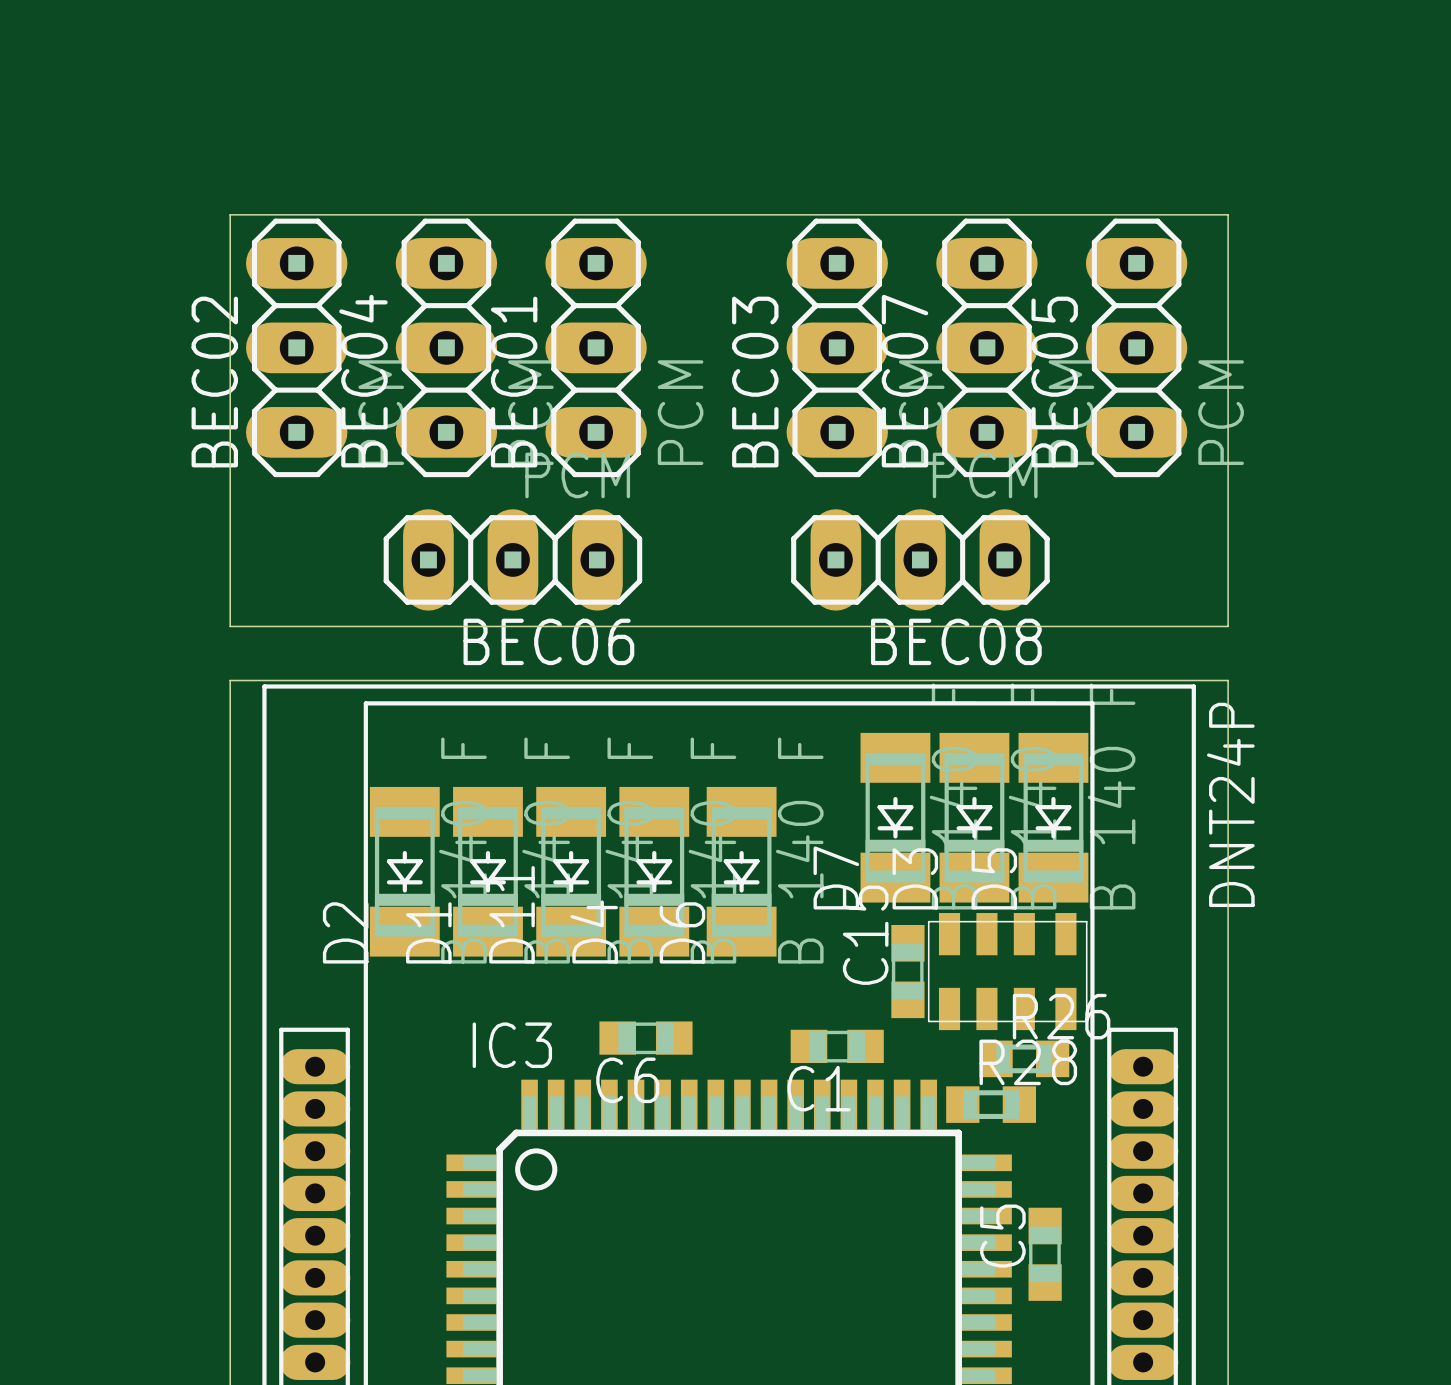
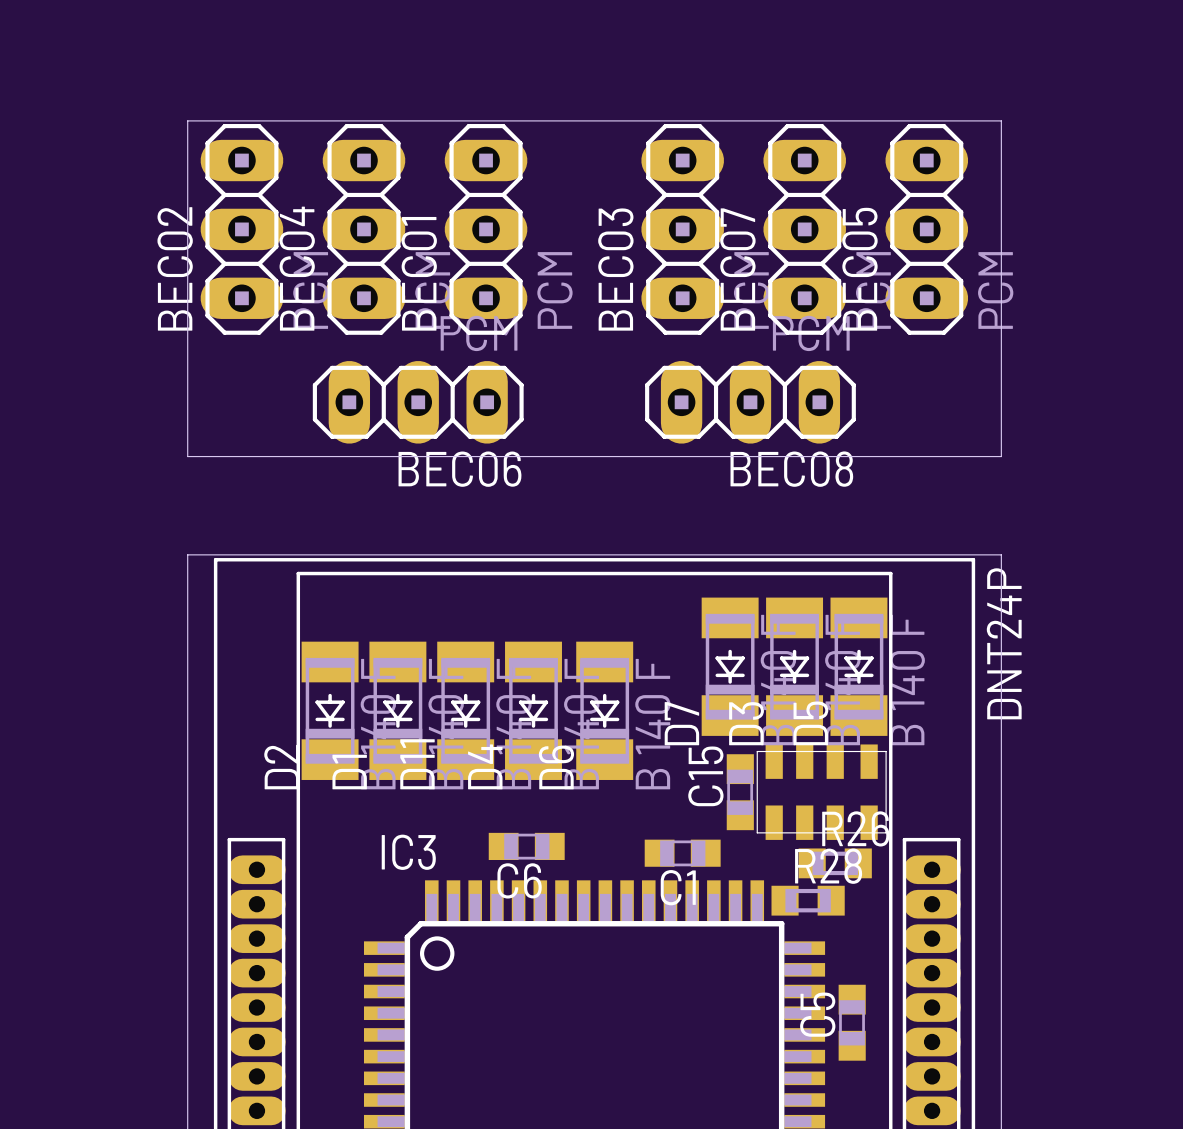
board edge: (230, 214) (1228, 214) -> (187, 175) (187, 120) (1001, 120) (1001, 175)
BEC02 position: (296, 347) -> (241, 229)
BEC04 position: (446, 347) -> (363, 229)
BEC01 position: (596, 347) -> (486, 229)
BEC03 position: (837, 347) -> (682, 229)
BEC07 position: (986, 347) -> (804, 229)
BEC05 position: (1136, 347) -> (926, 229)
board edge: (230, 559) (230, 626) (1228, 626) (1228, 559) -> (187, 456) (1001, 456)
BEC06 position: (512, 559) -> (418, 402)
BEC08 position: (920, 559) -> (750, 402)

